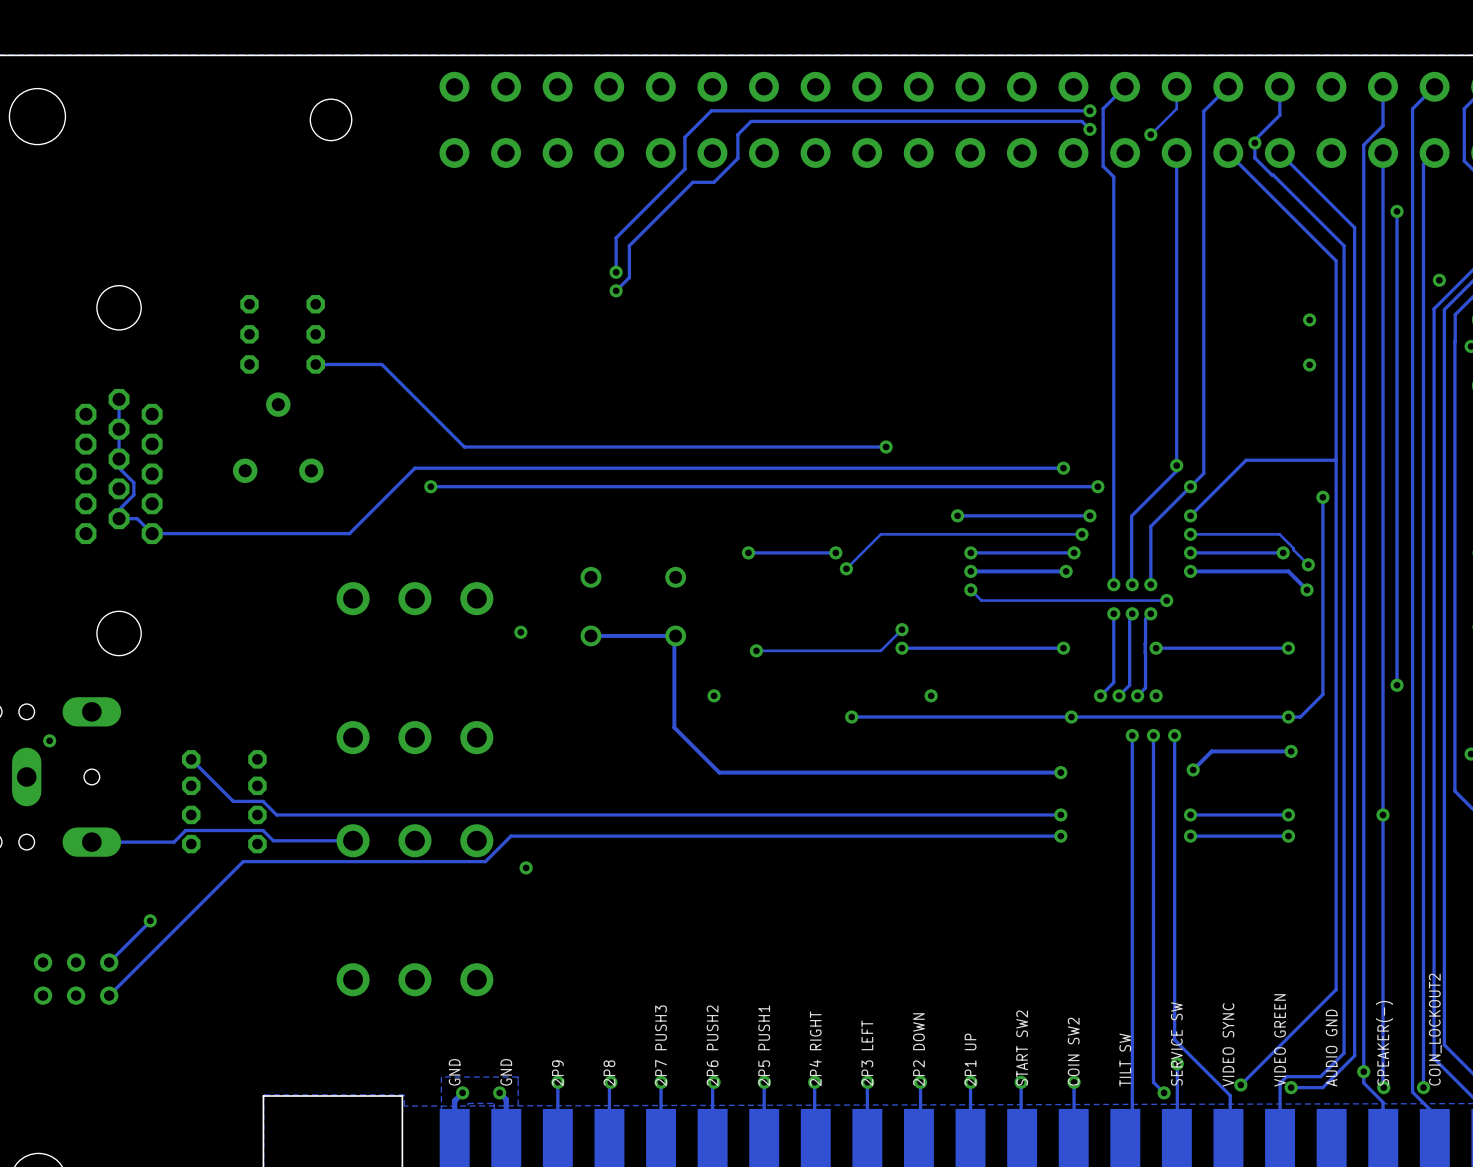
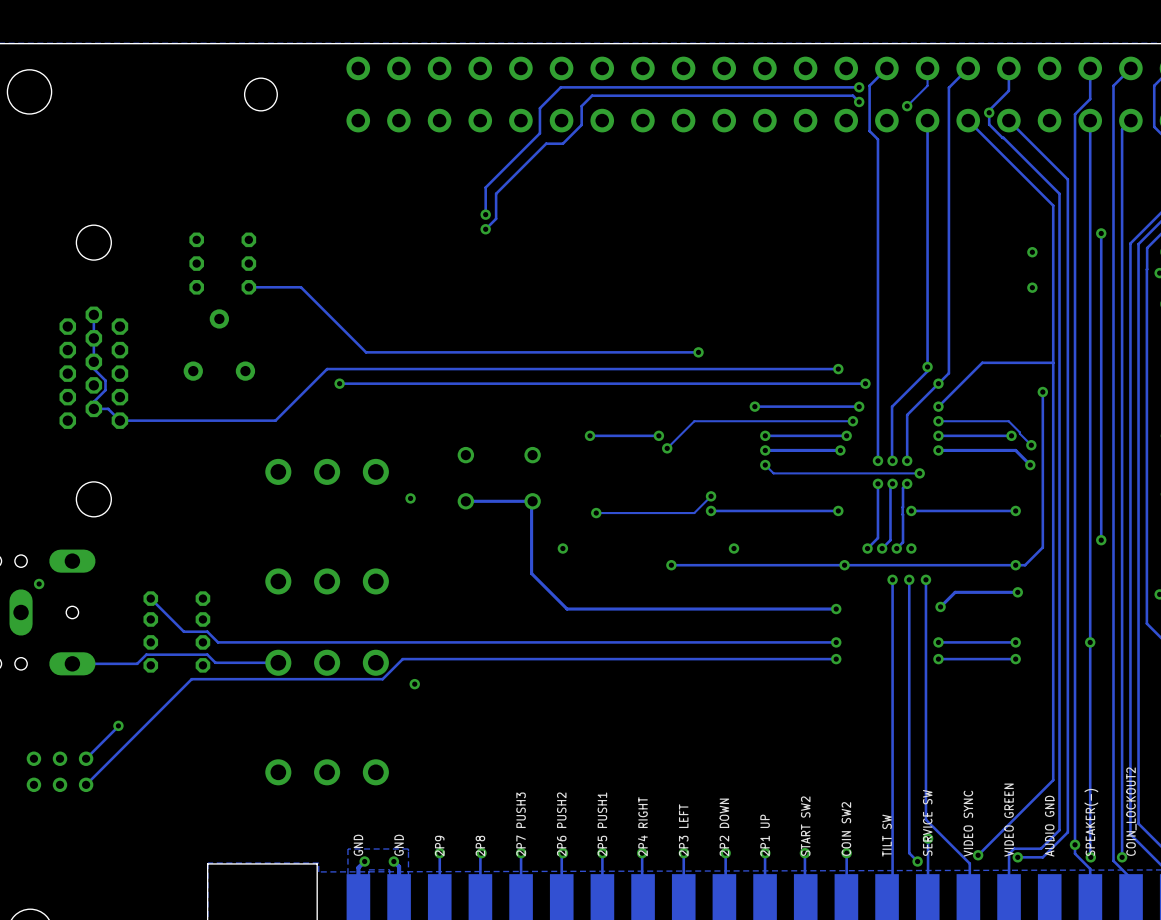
track: (1397, 211) (1397, 296) -> none
via: (1397, 211) -> none
via: (1439, 280) -> none
via: none -> (1101, 233)

